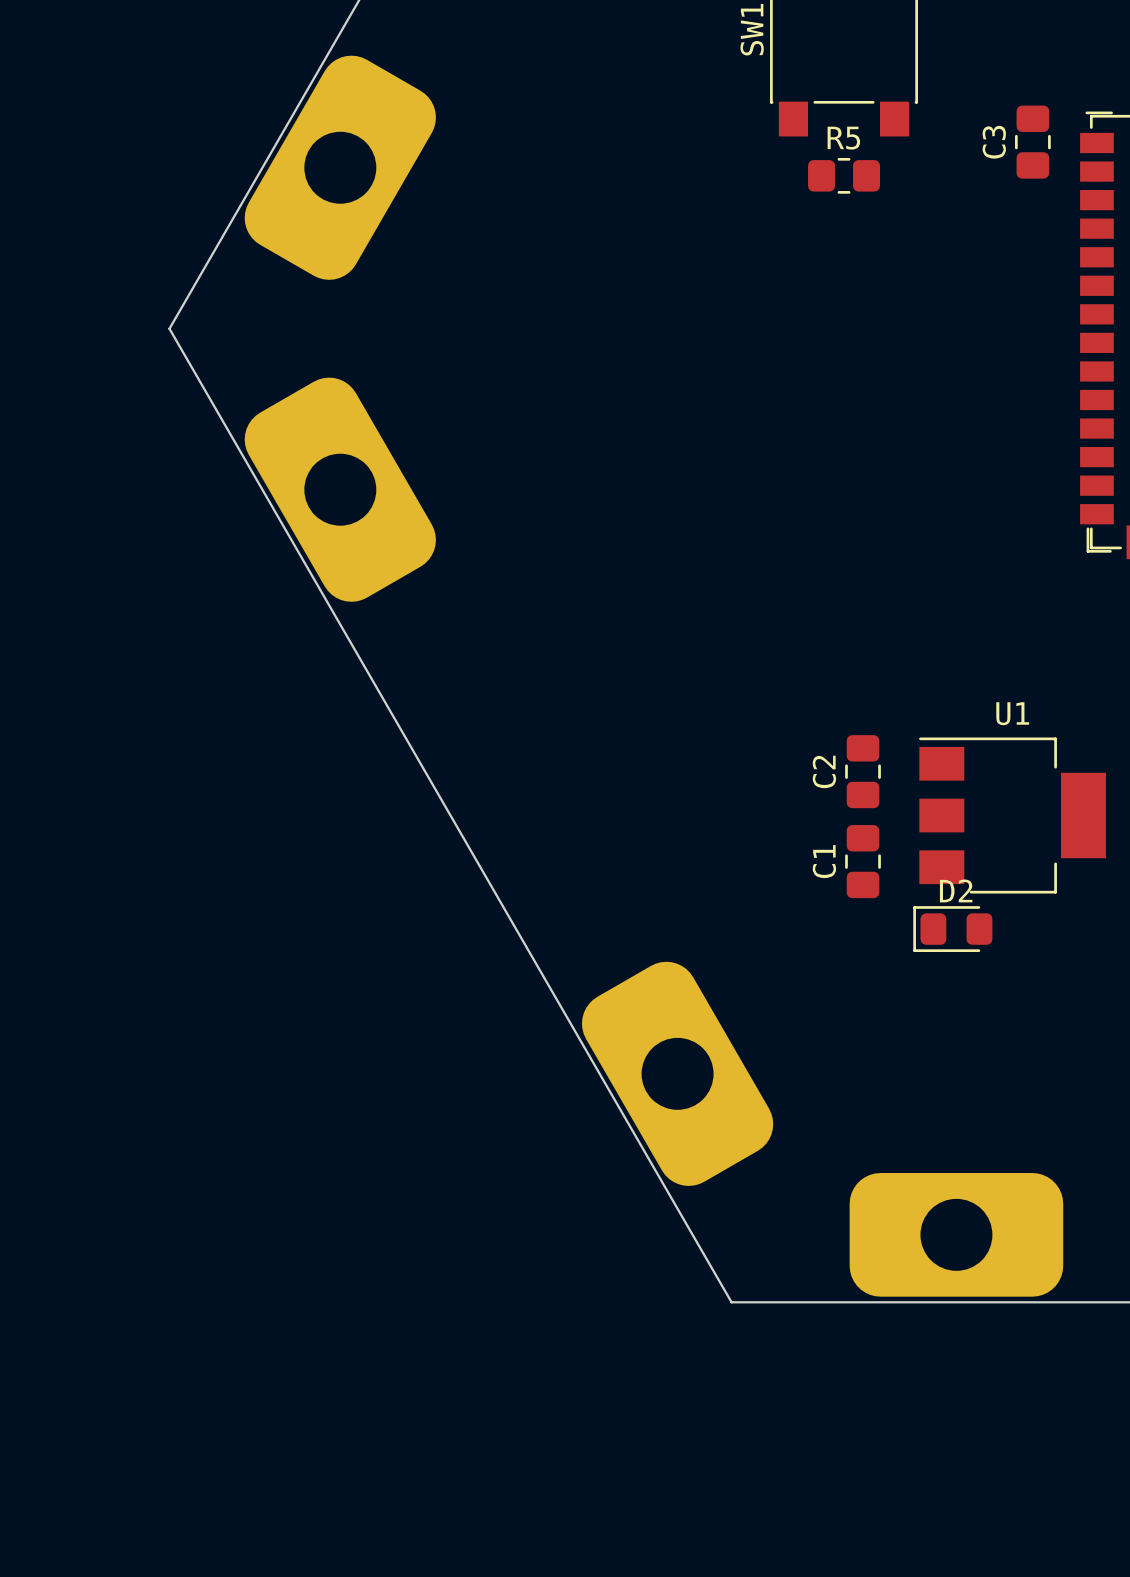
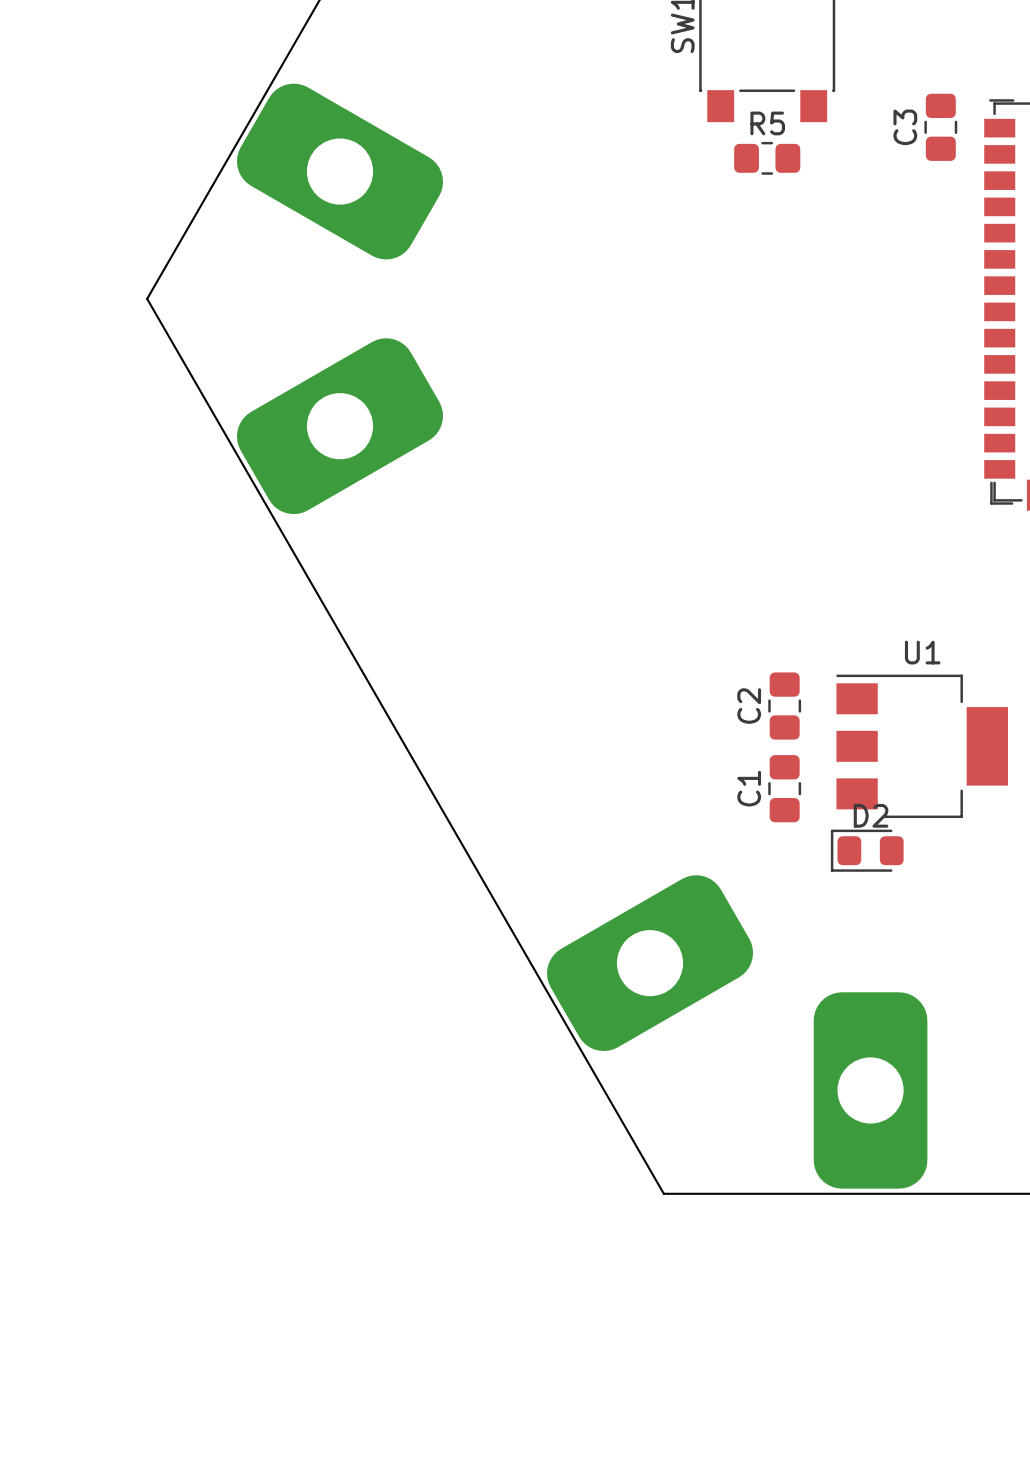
part rotation: 0° (340, 167) -> 90° clockwise (340, 171)
part rotation: 0° (340, 489) -> 90° clockwise (340, 426)
part rotation: 0° (677, 1073) -> 90° clockwise (650, 963)
part rotation: 0° (956, 1234) -> 90° clockwise (870, 1090)

